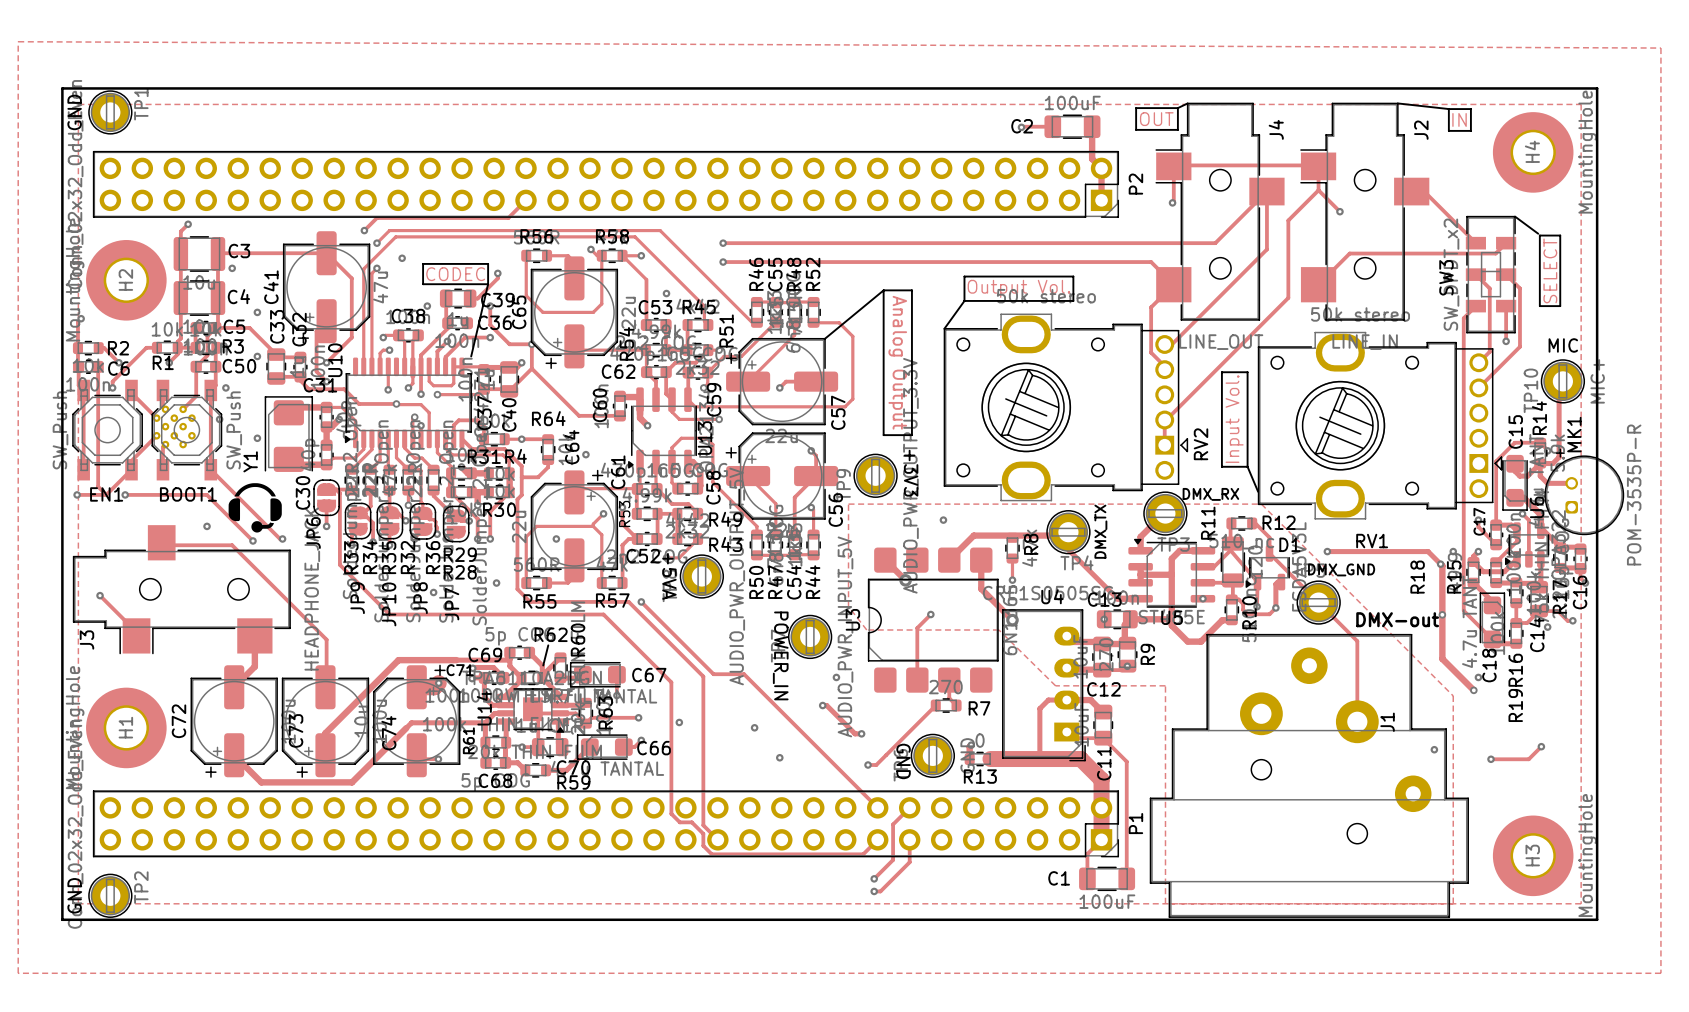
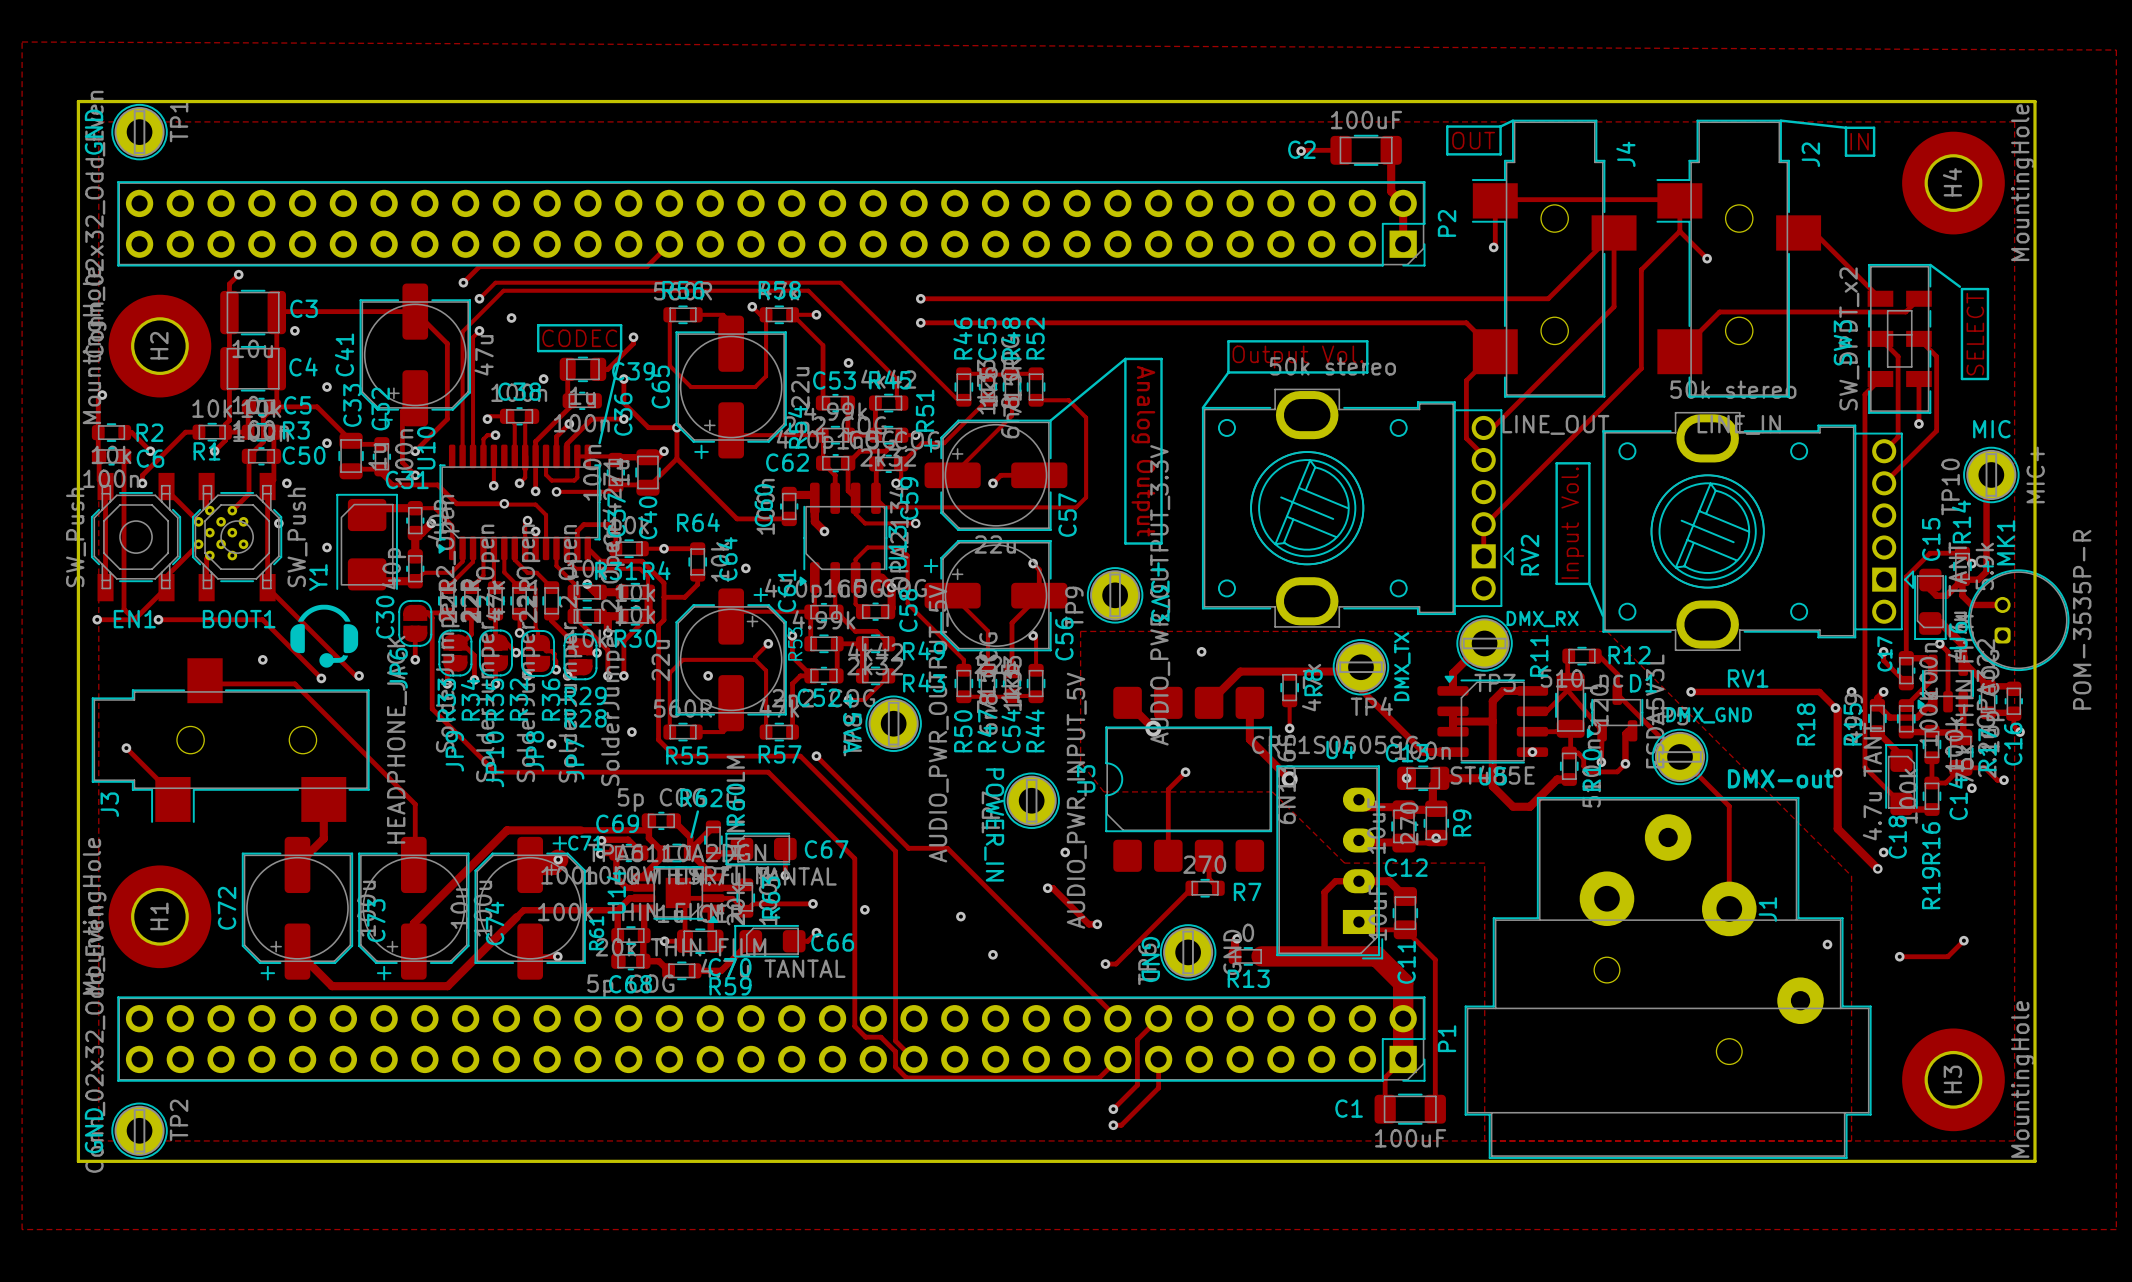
C36 name rotation: 0° (495, 322) -> 90° counterclockwise (623, 414)

